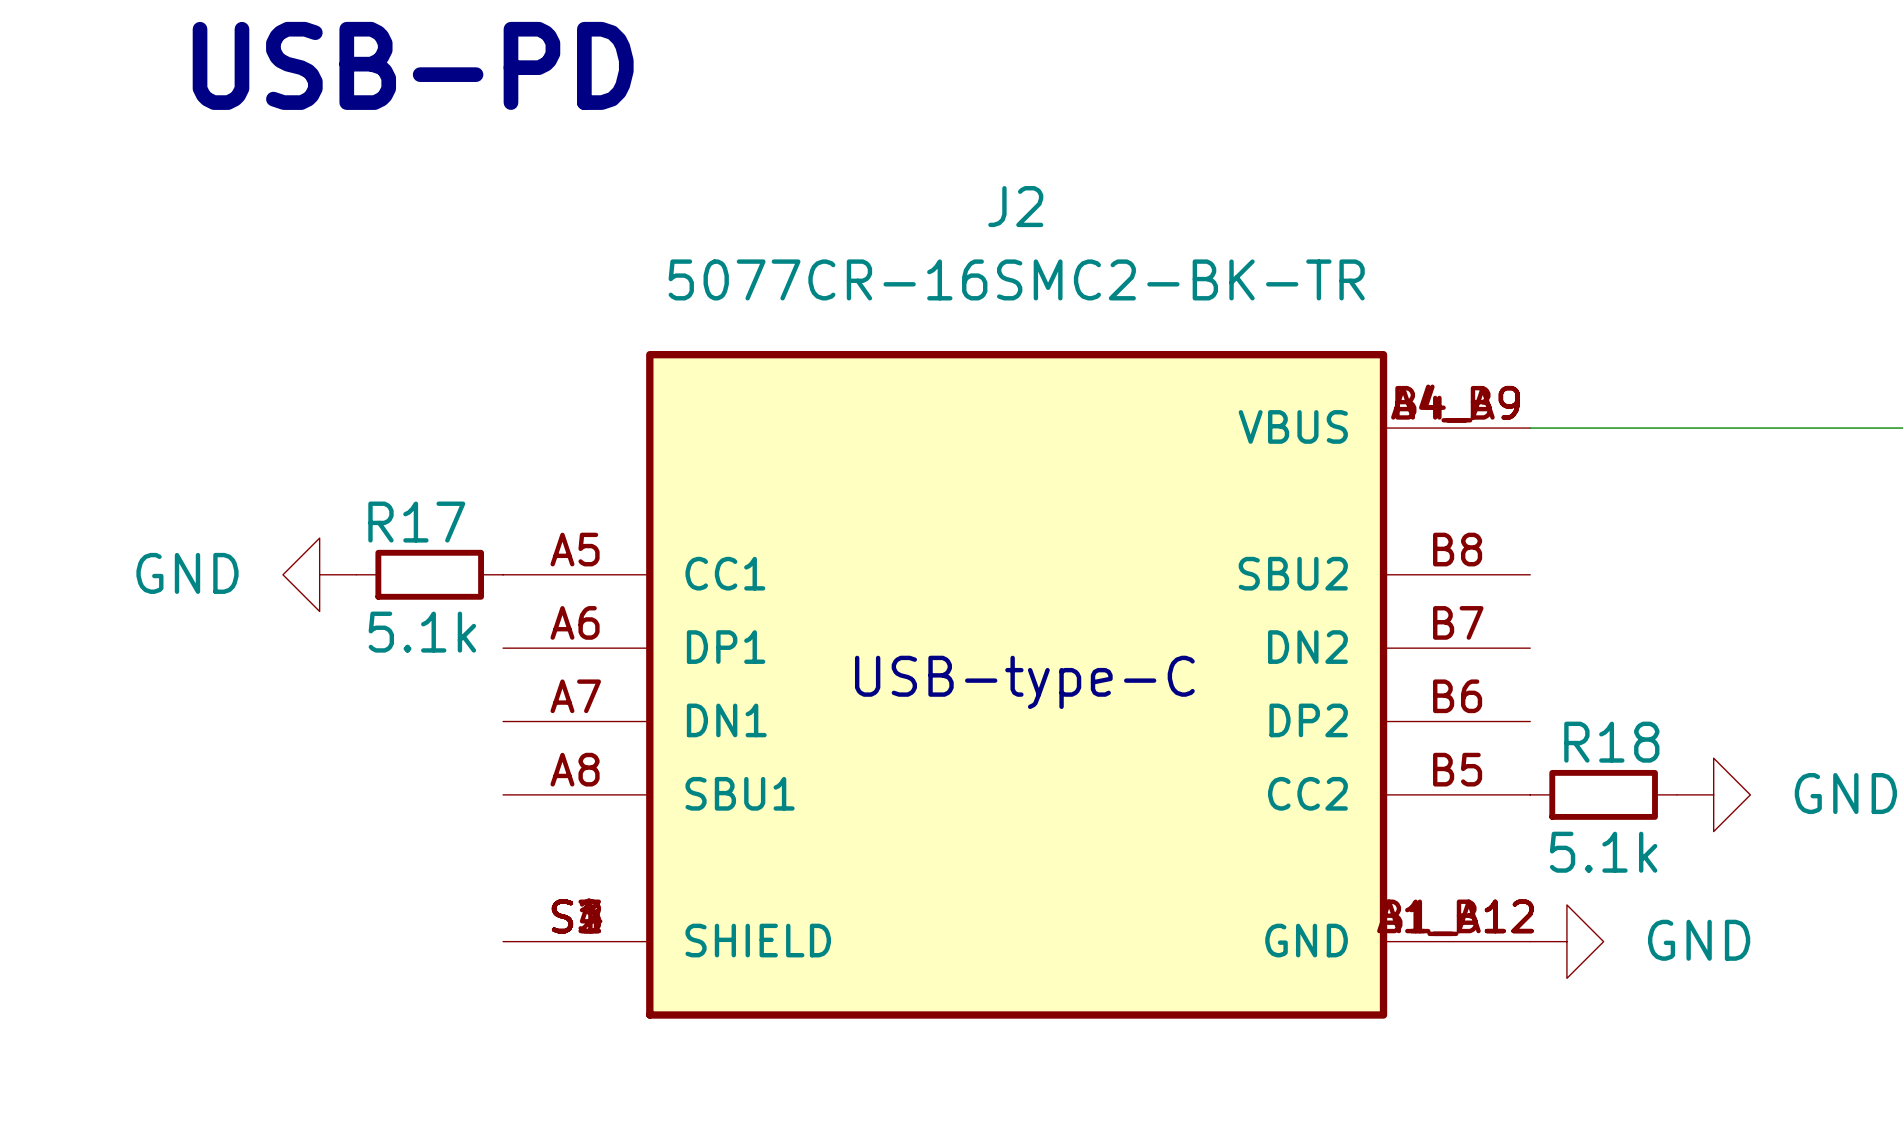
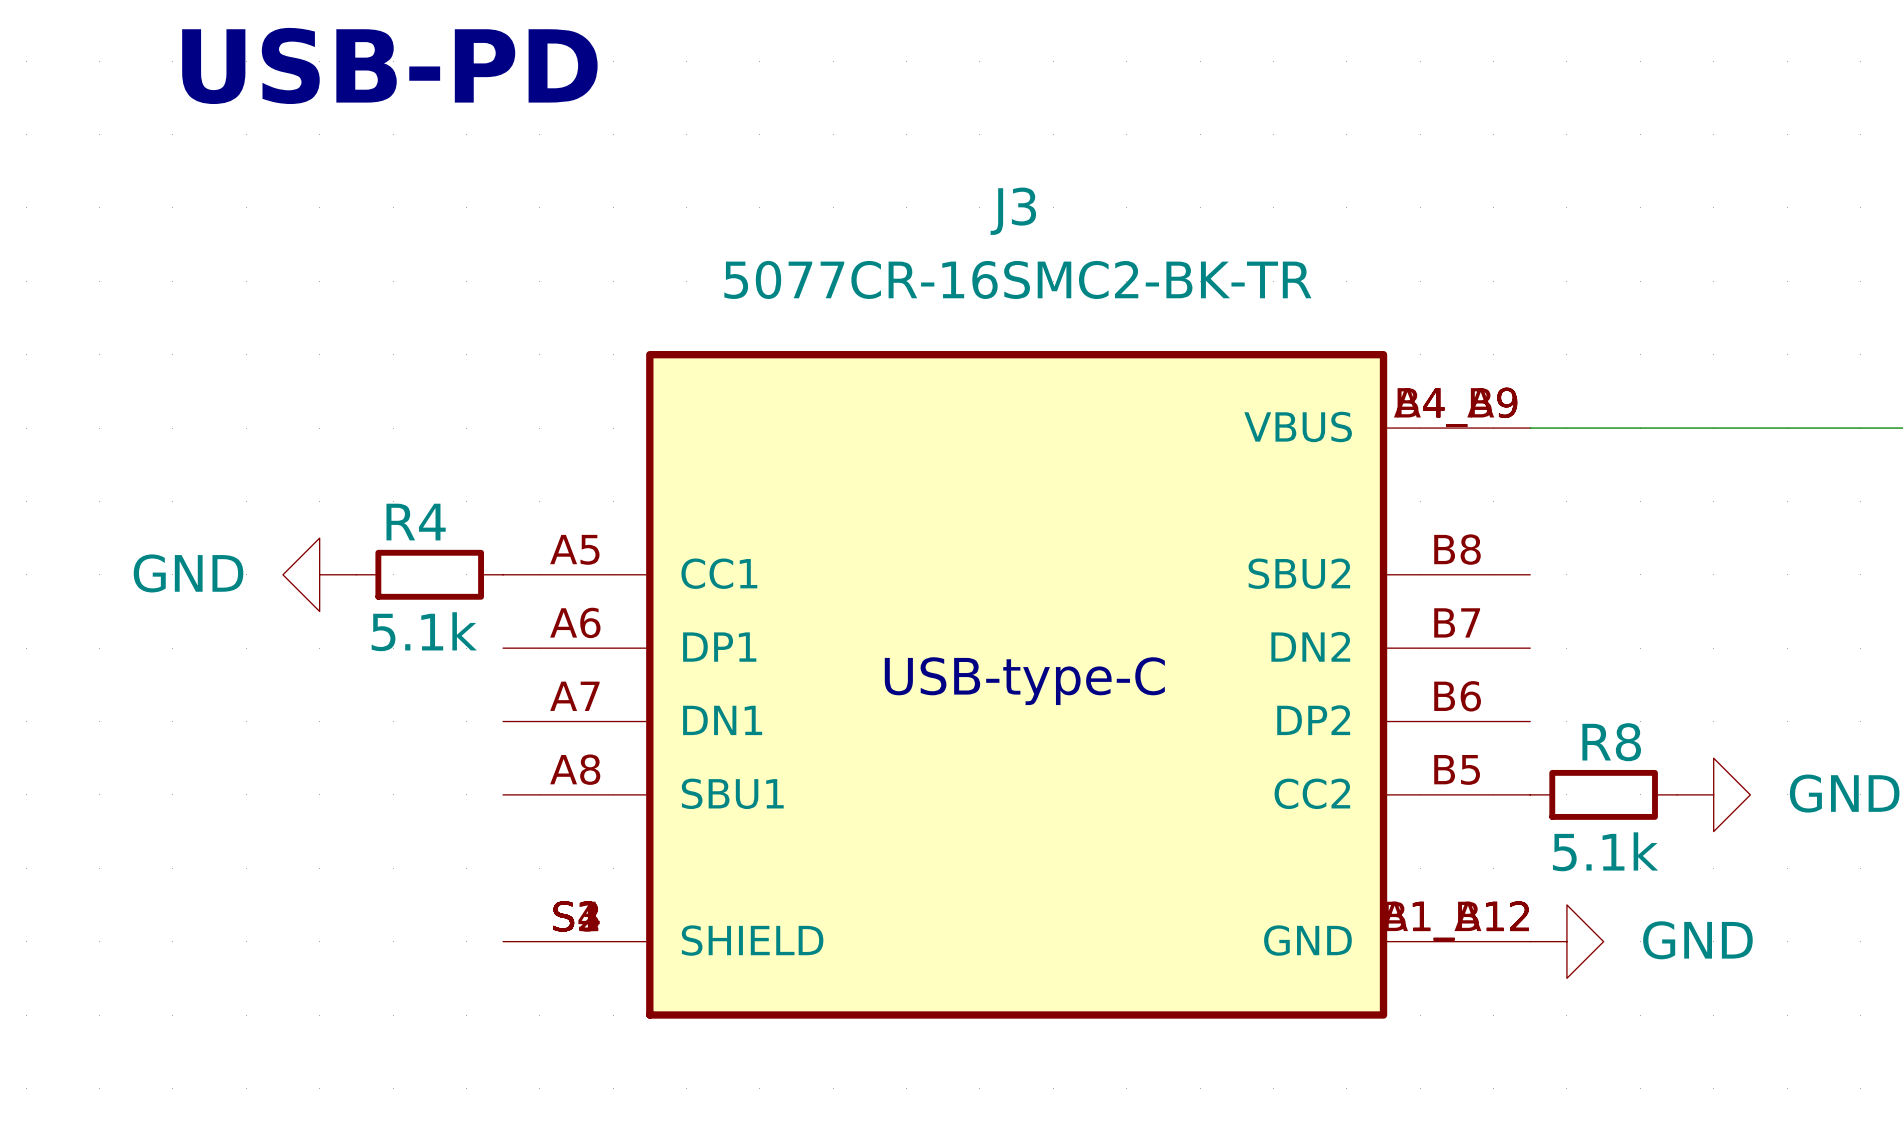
J2 name: J2 (1015, 206) -> J3 (1013, 211)
R17 name: R17 (416, 522) -> R4 (416, 522)
R18 name: R18 (1611, 742) -> R8 (1611, 742)

